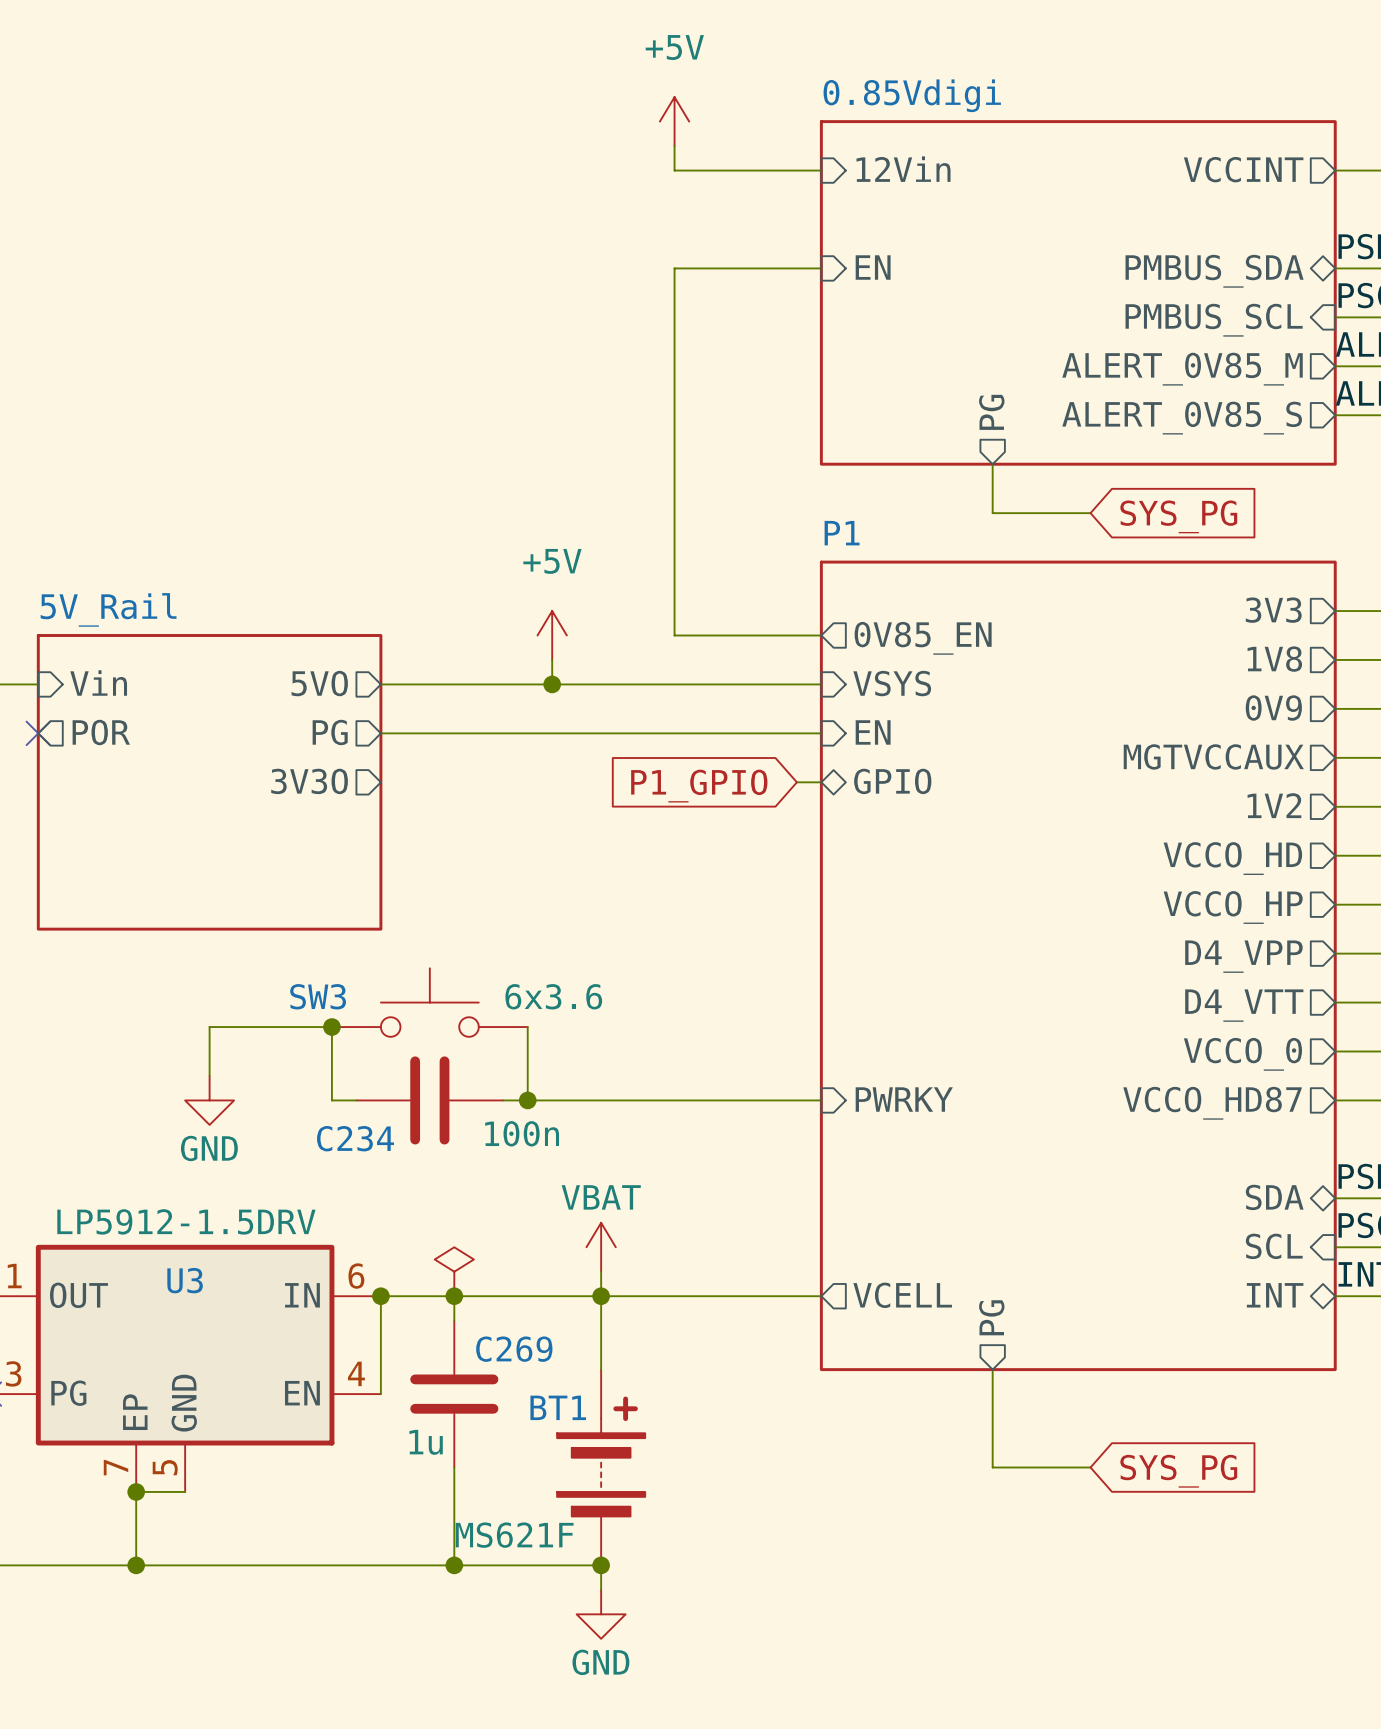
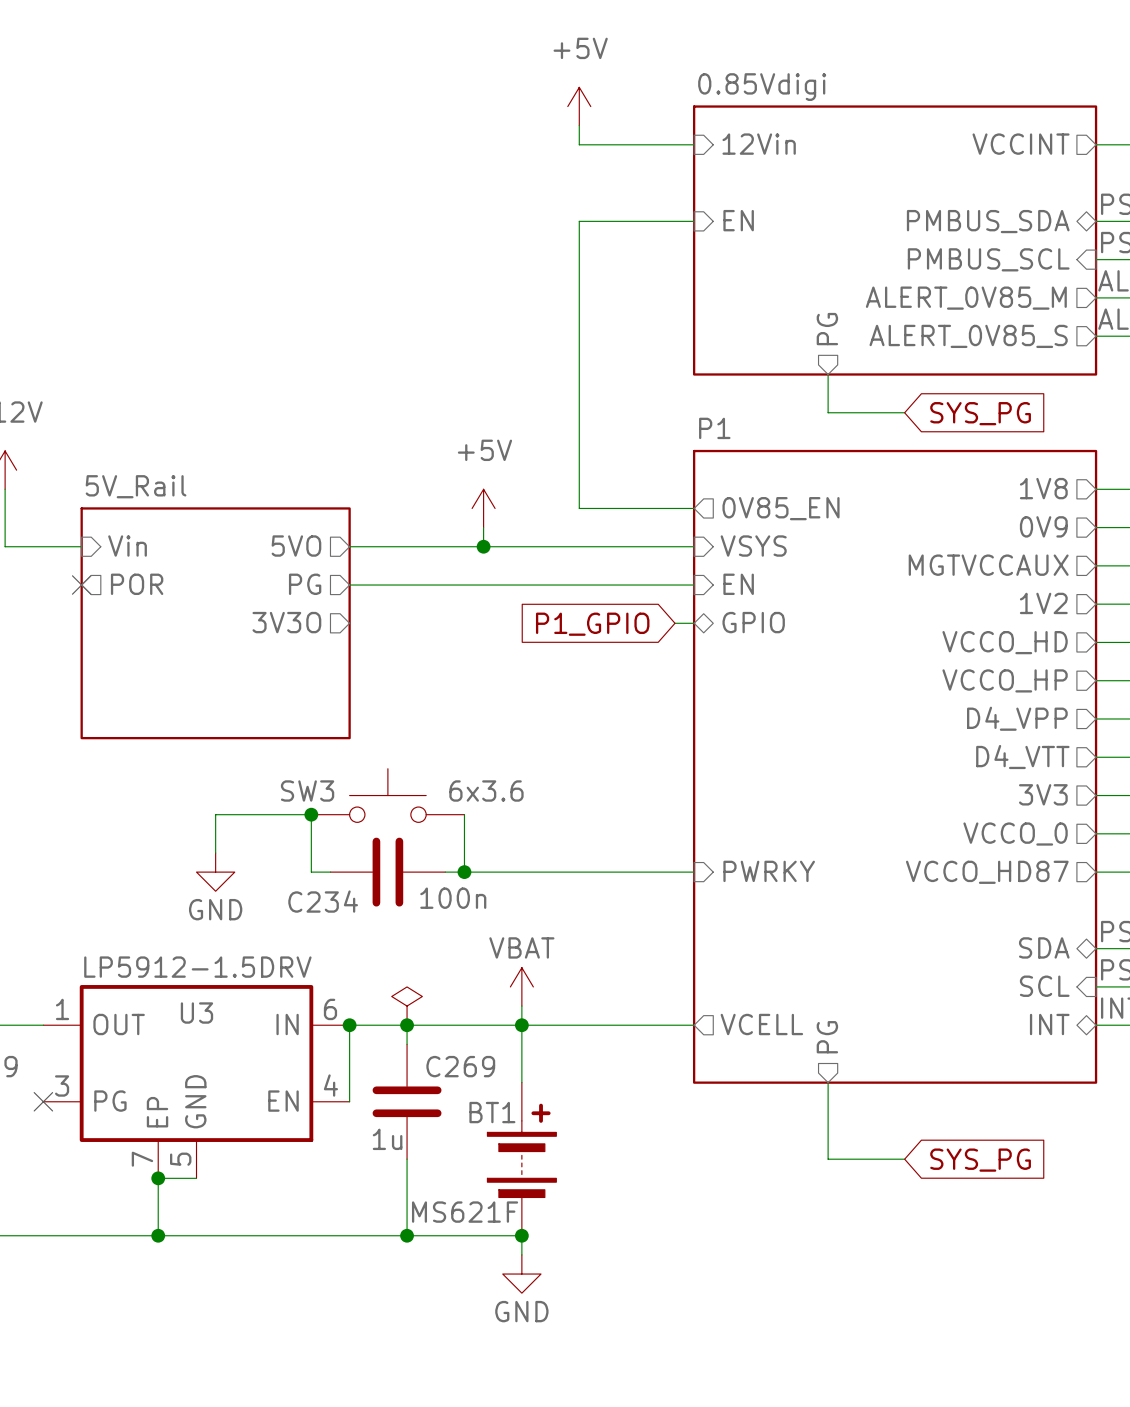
sheet pin: 3V3 (1273, 610) -> 1V8 (1043, 488)
sheet pin: 1V8 (1274, 659) -> 0V9 (1043, 526)
sheet pin: 0V9 (1273, 708) -> MGTVCCAUX (988, 565)
sheet pin: MGTVCCAUX (1213, 756) -> 1V2 (1043, 603)
sheet pin: 1V2 (1274, 805) -> VCCO_HD (1005, 642)
sheet pin: VCCO_HD (1232, 858) -> VCCO_HP (1005, 680)
sheet pin: VCCO_HP (1233, 907) -> D4_VPP (1017, 718)
sheet pin: D4_VPP (1243, 956) -> D4_VTT (1022, 757)
sheet pin: D4_VTT (1244, 1005) -> 3V3 (1043, 794)

